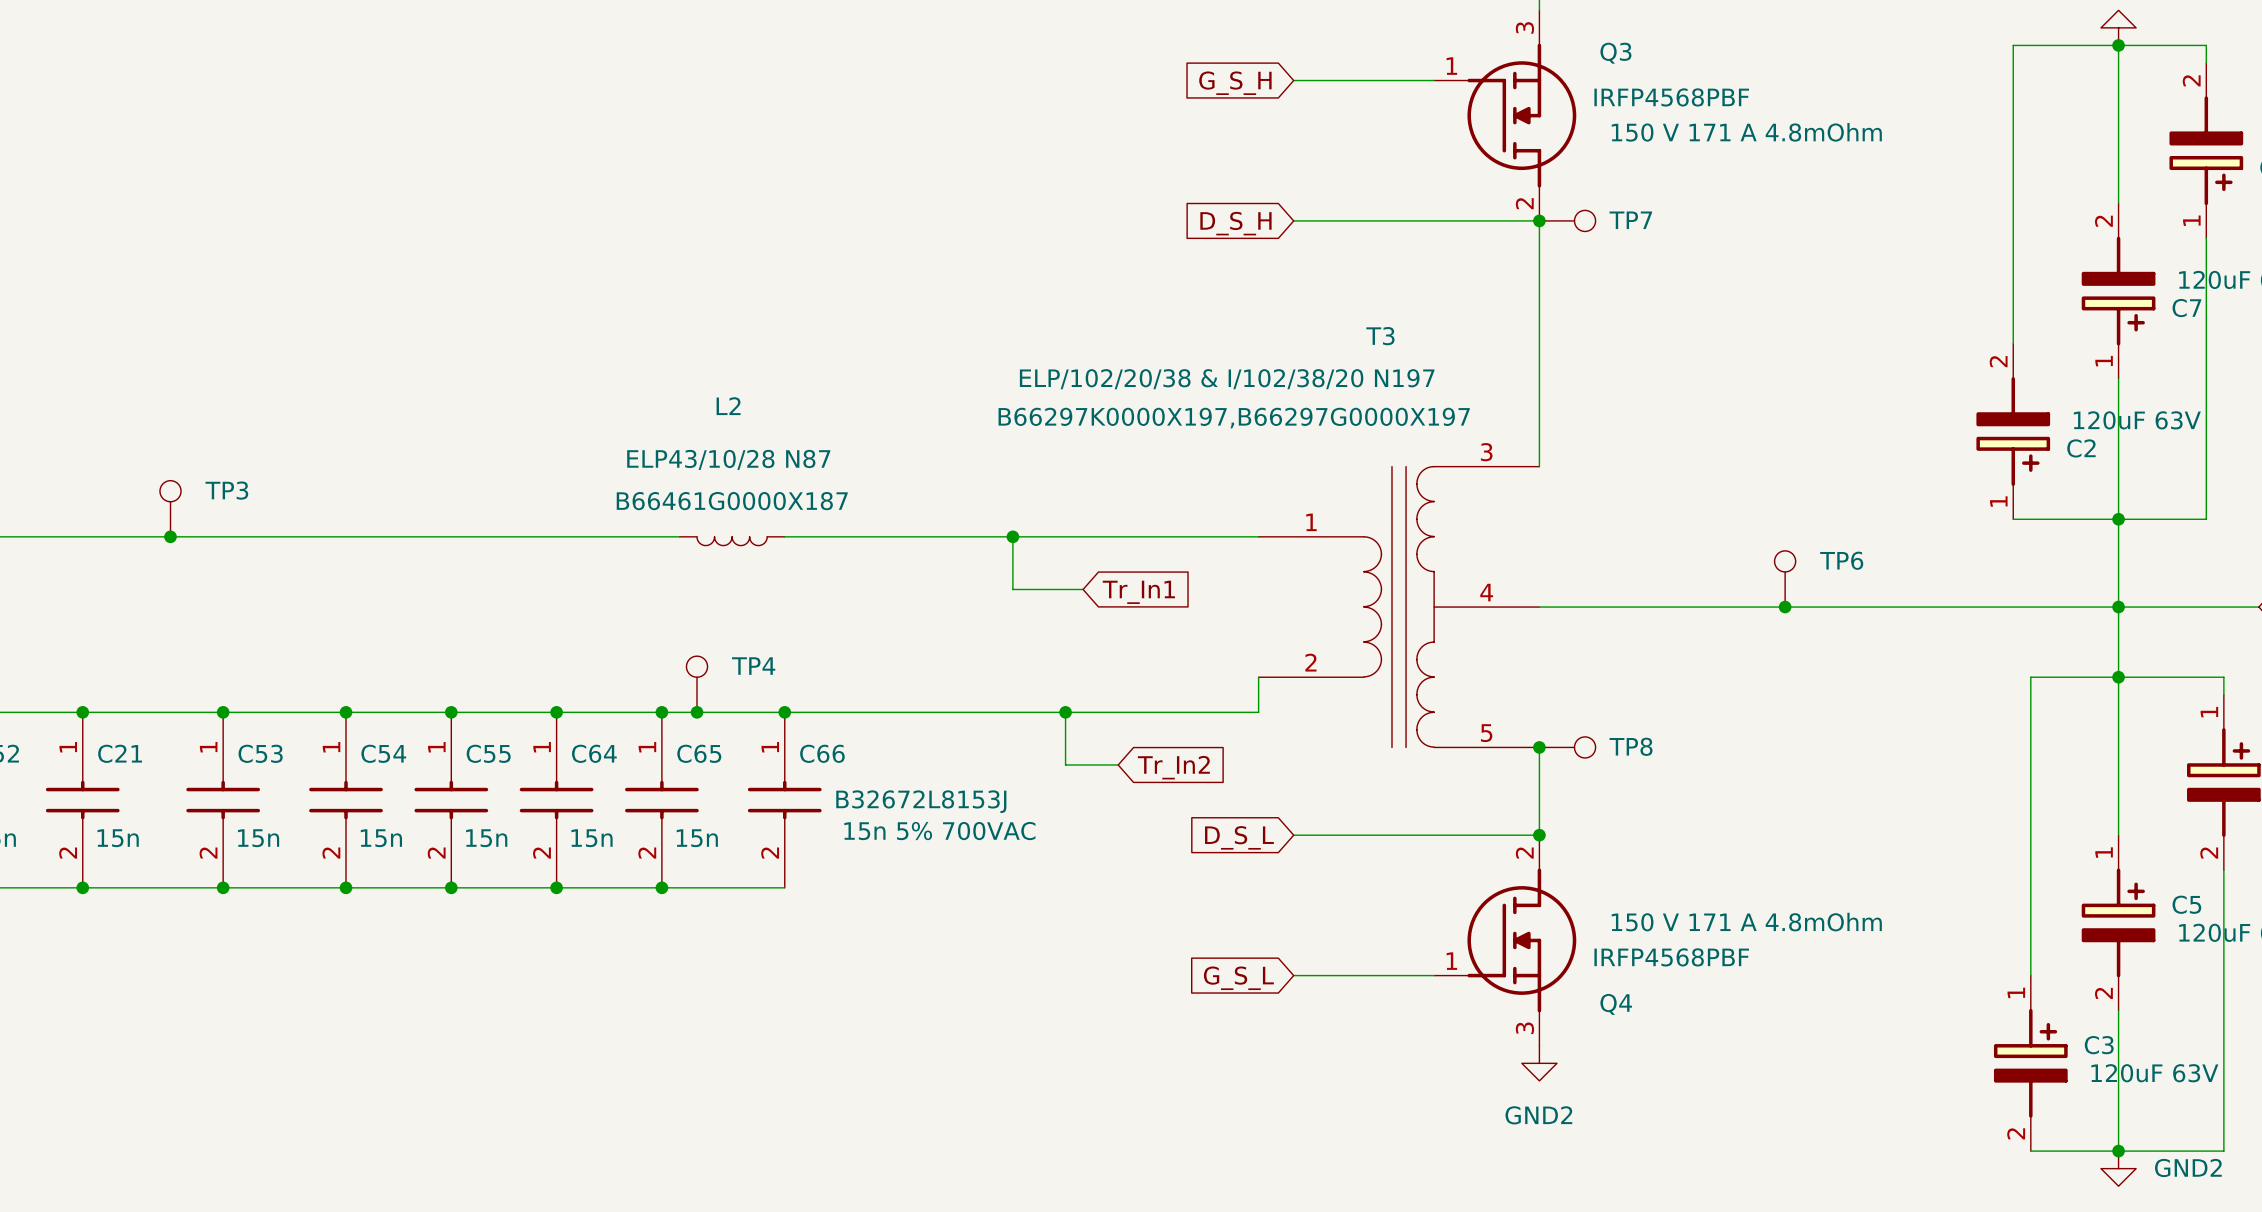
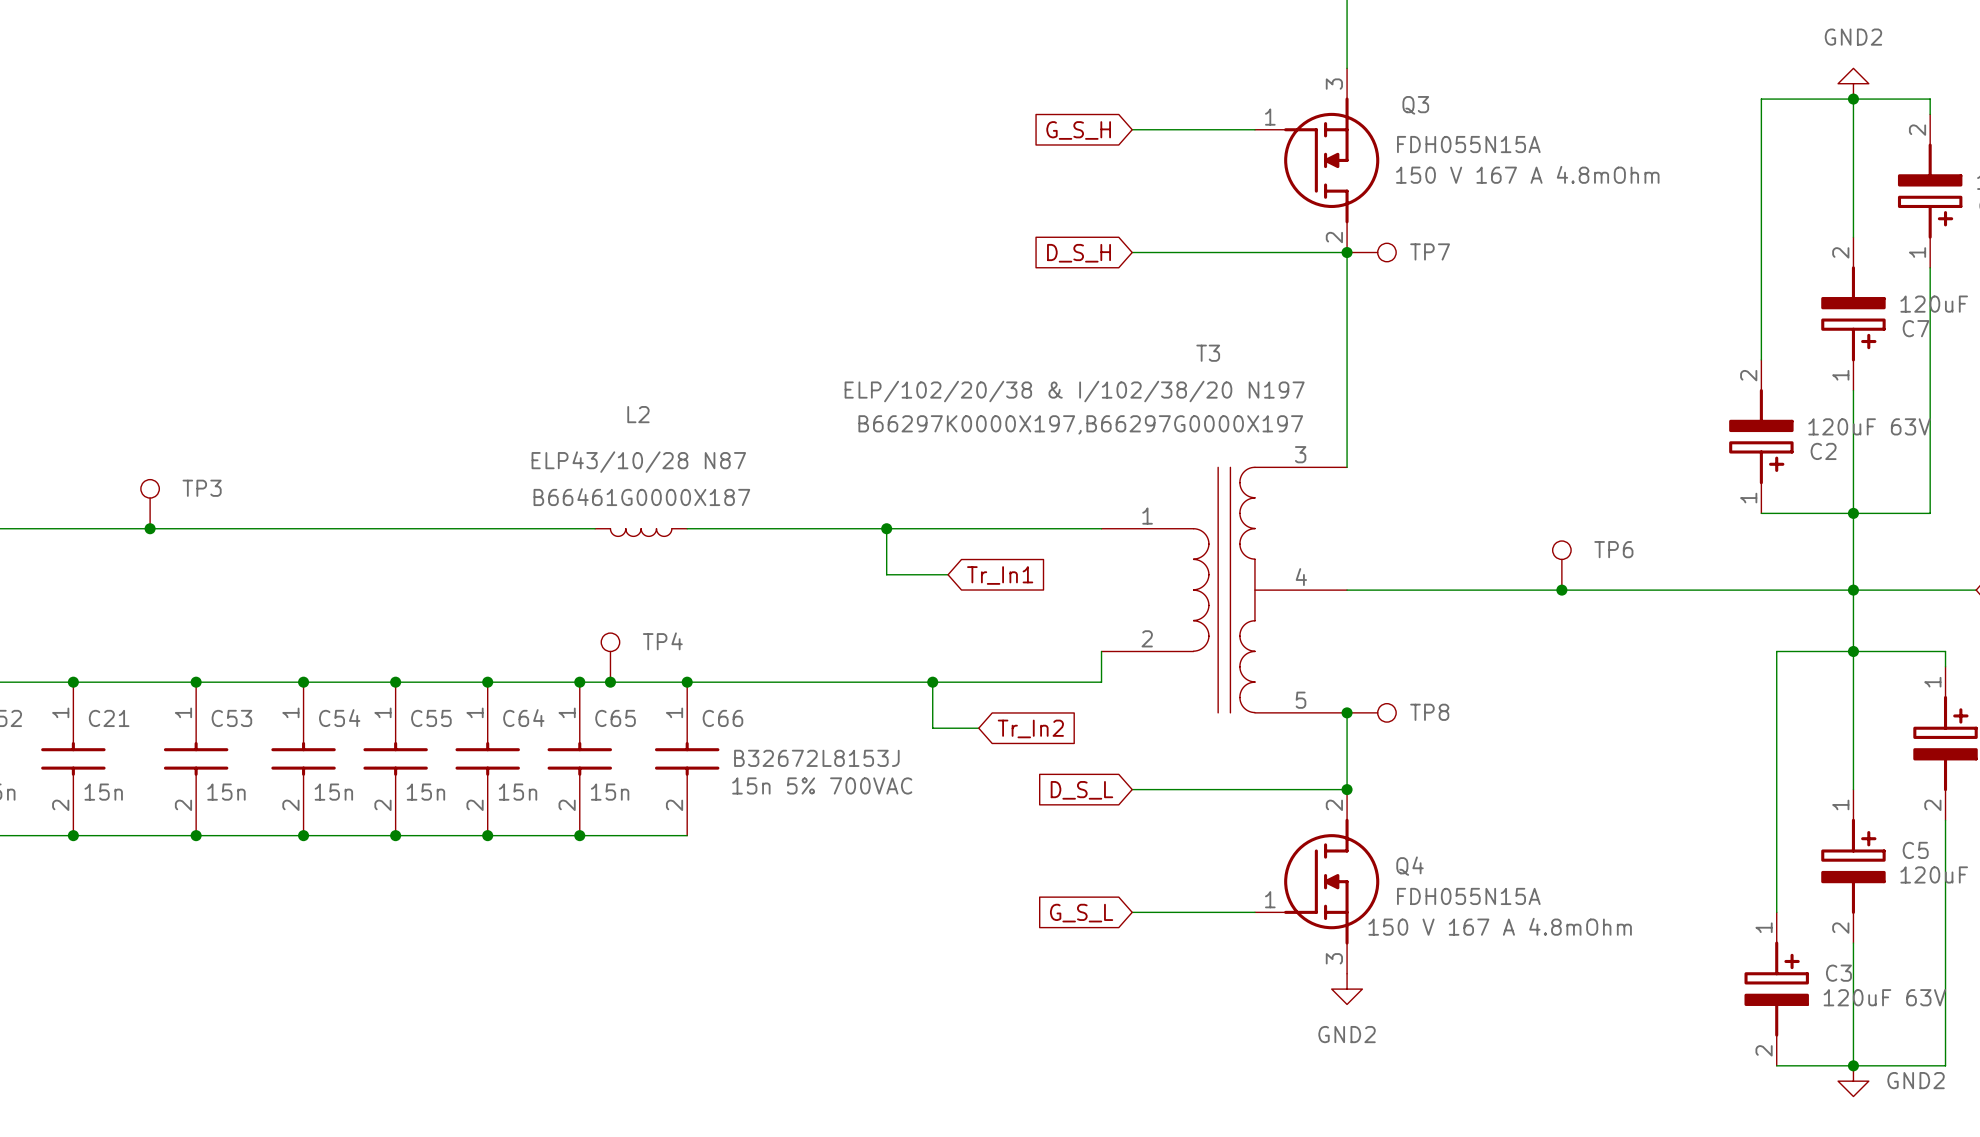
Q3 value: IRFP4568PBF (1671, 97) -> FDH055N15A (1468, 144)
Q3 text: 150 V 171 A 4.8mOhm (1746, 132) -> 150 V 167 A 4.8mOhm (1527, 174)
Q4 text: 150 V 171 A 4.8mOhm (1746, 922) -> 150 V 167 A 4.8mOhm (1500, 926)
Q4 value: IRFP4568PBF (1671, 957) -> FDH055N15A (1468, 896)
Q4 name position: Q4 (1616, 1004) -> Q4 (1410, 866)

